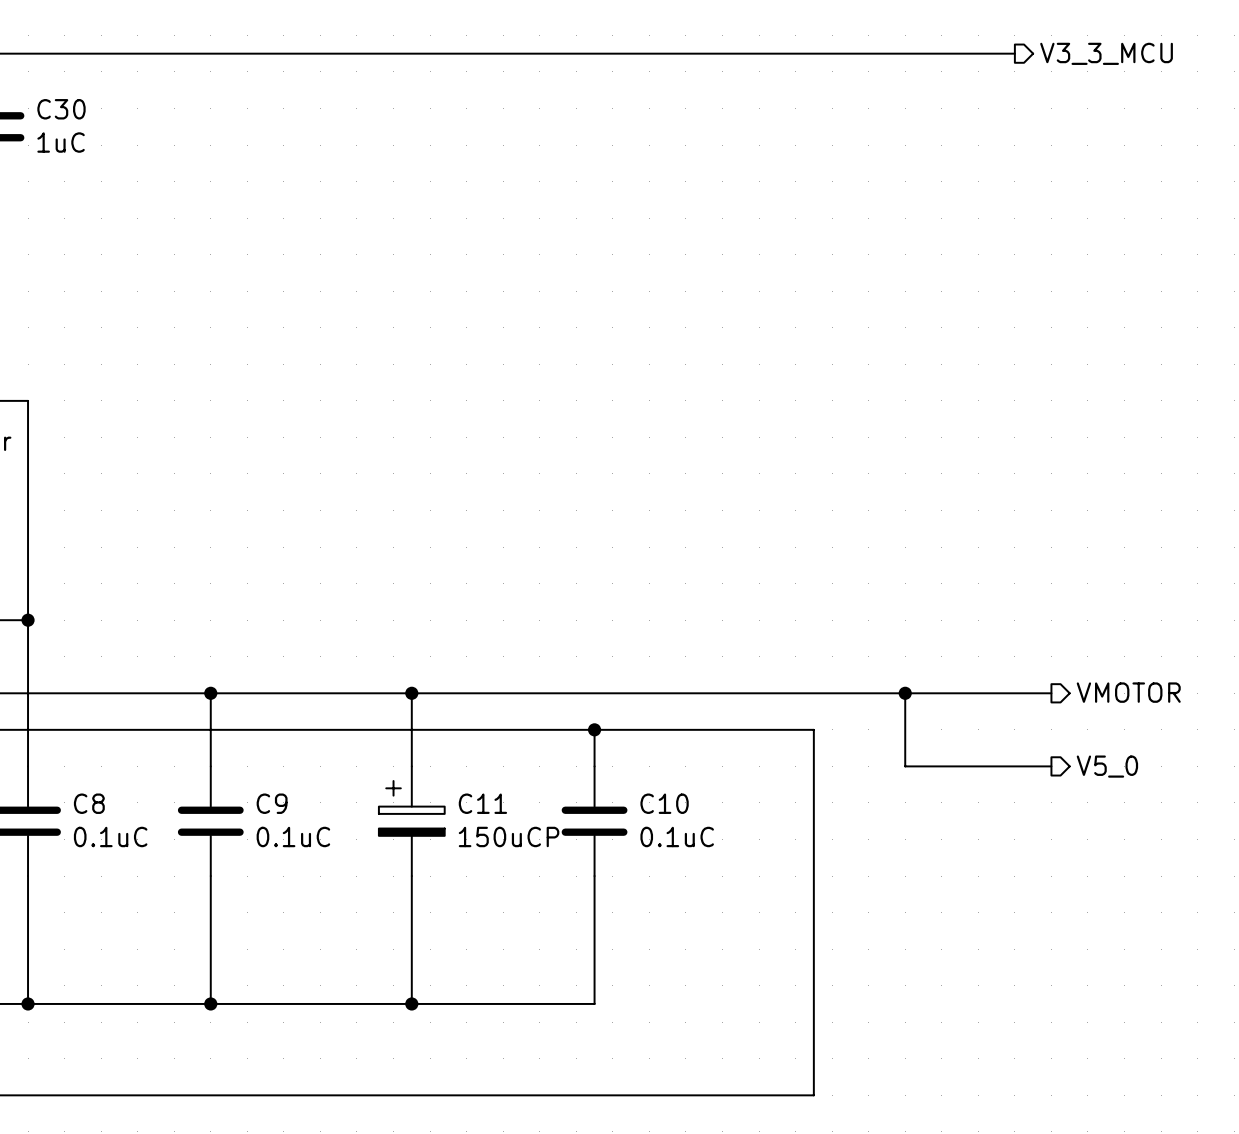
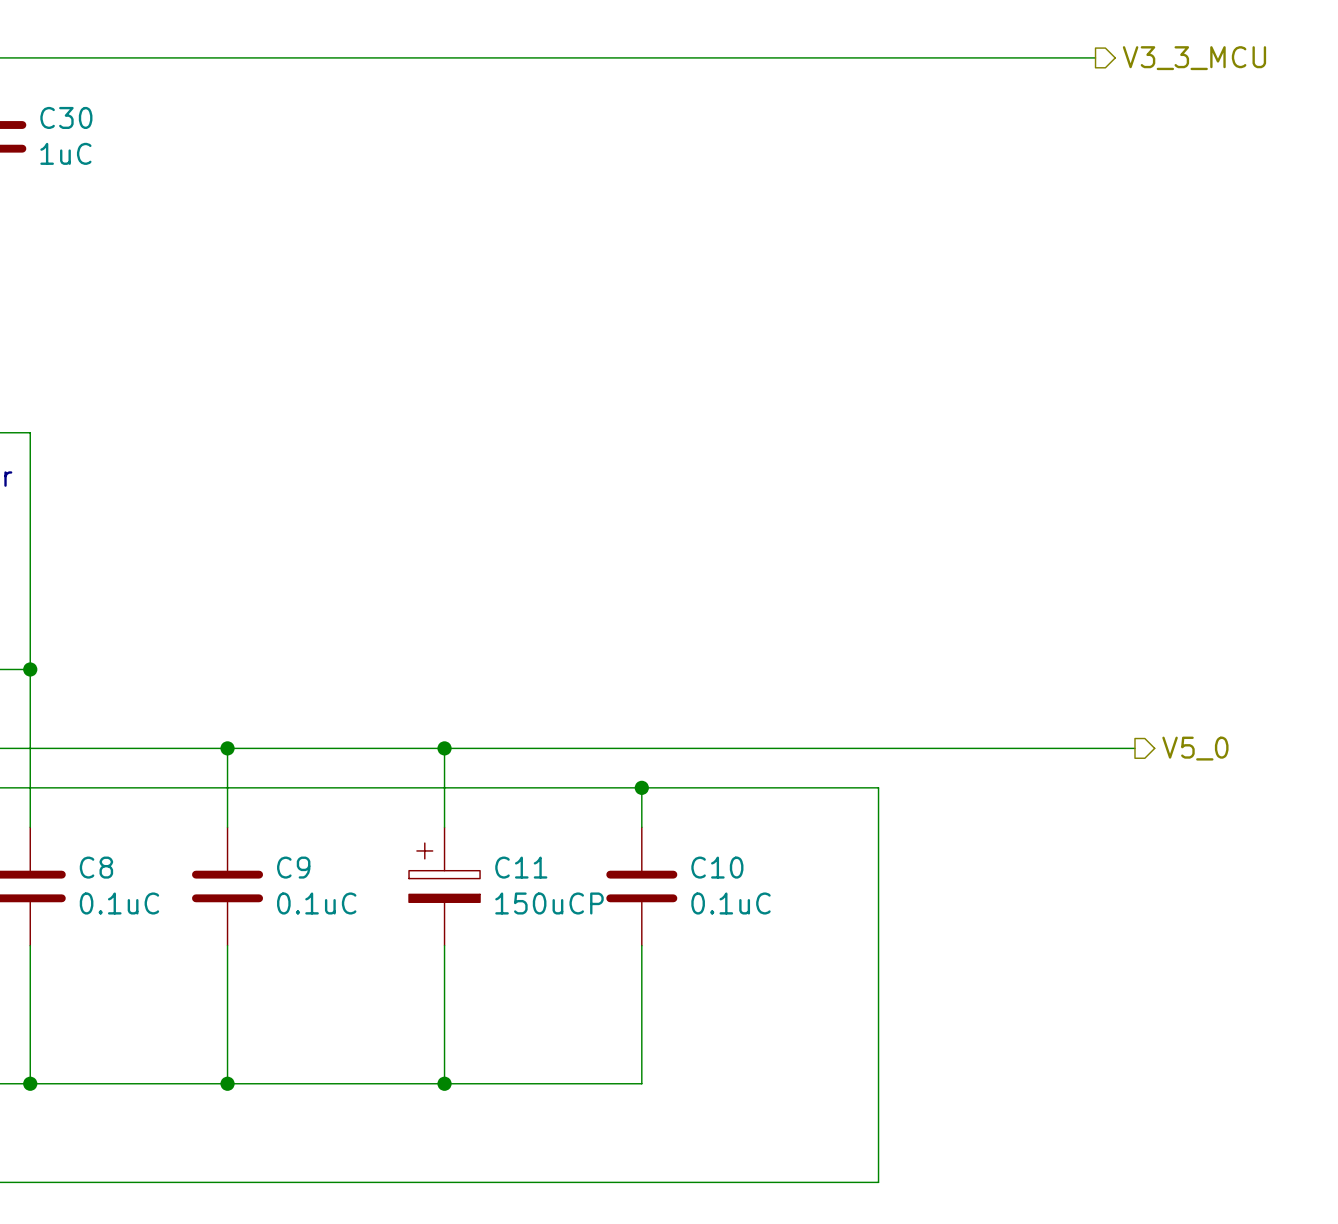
hierarchical label: VMOTOR (1128, 692) -> V5_0 (1195, 748)
wire: (905, 693) (905, 766) (1051, 766) -> none
junction: (905, 693) -> none
hierarchical label: V5_0 (1107, 766) -> none

